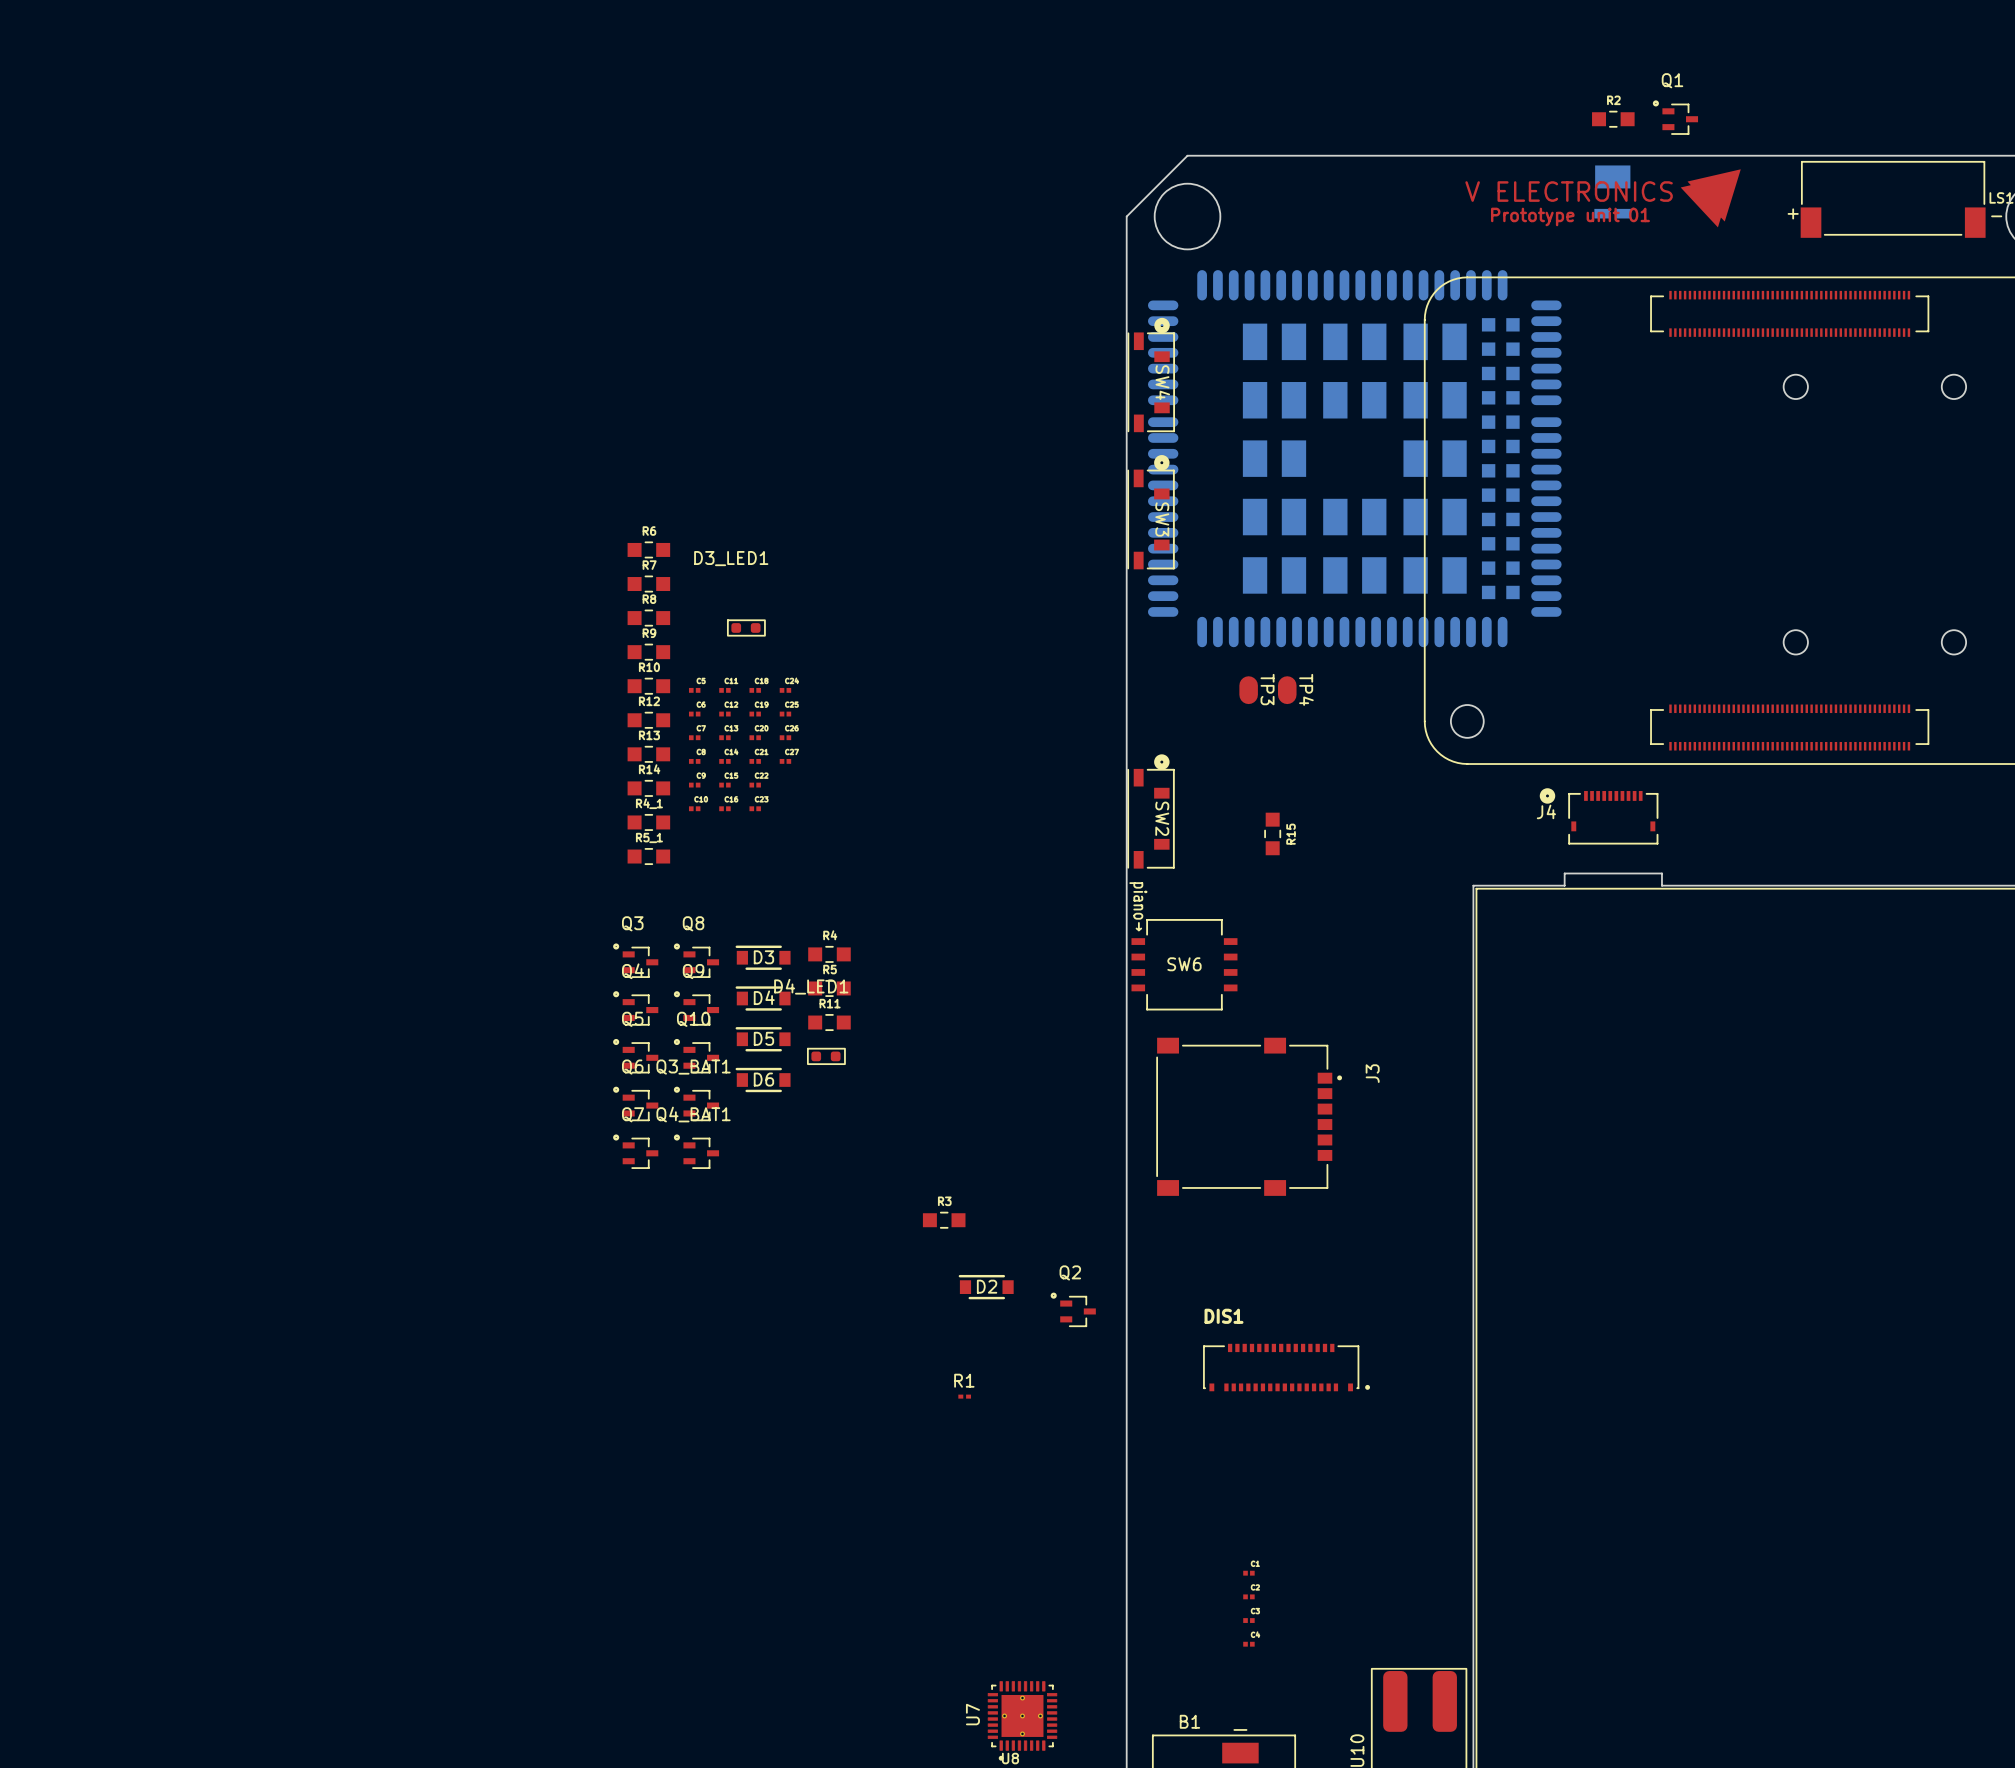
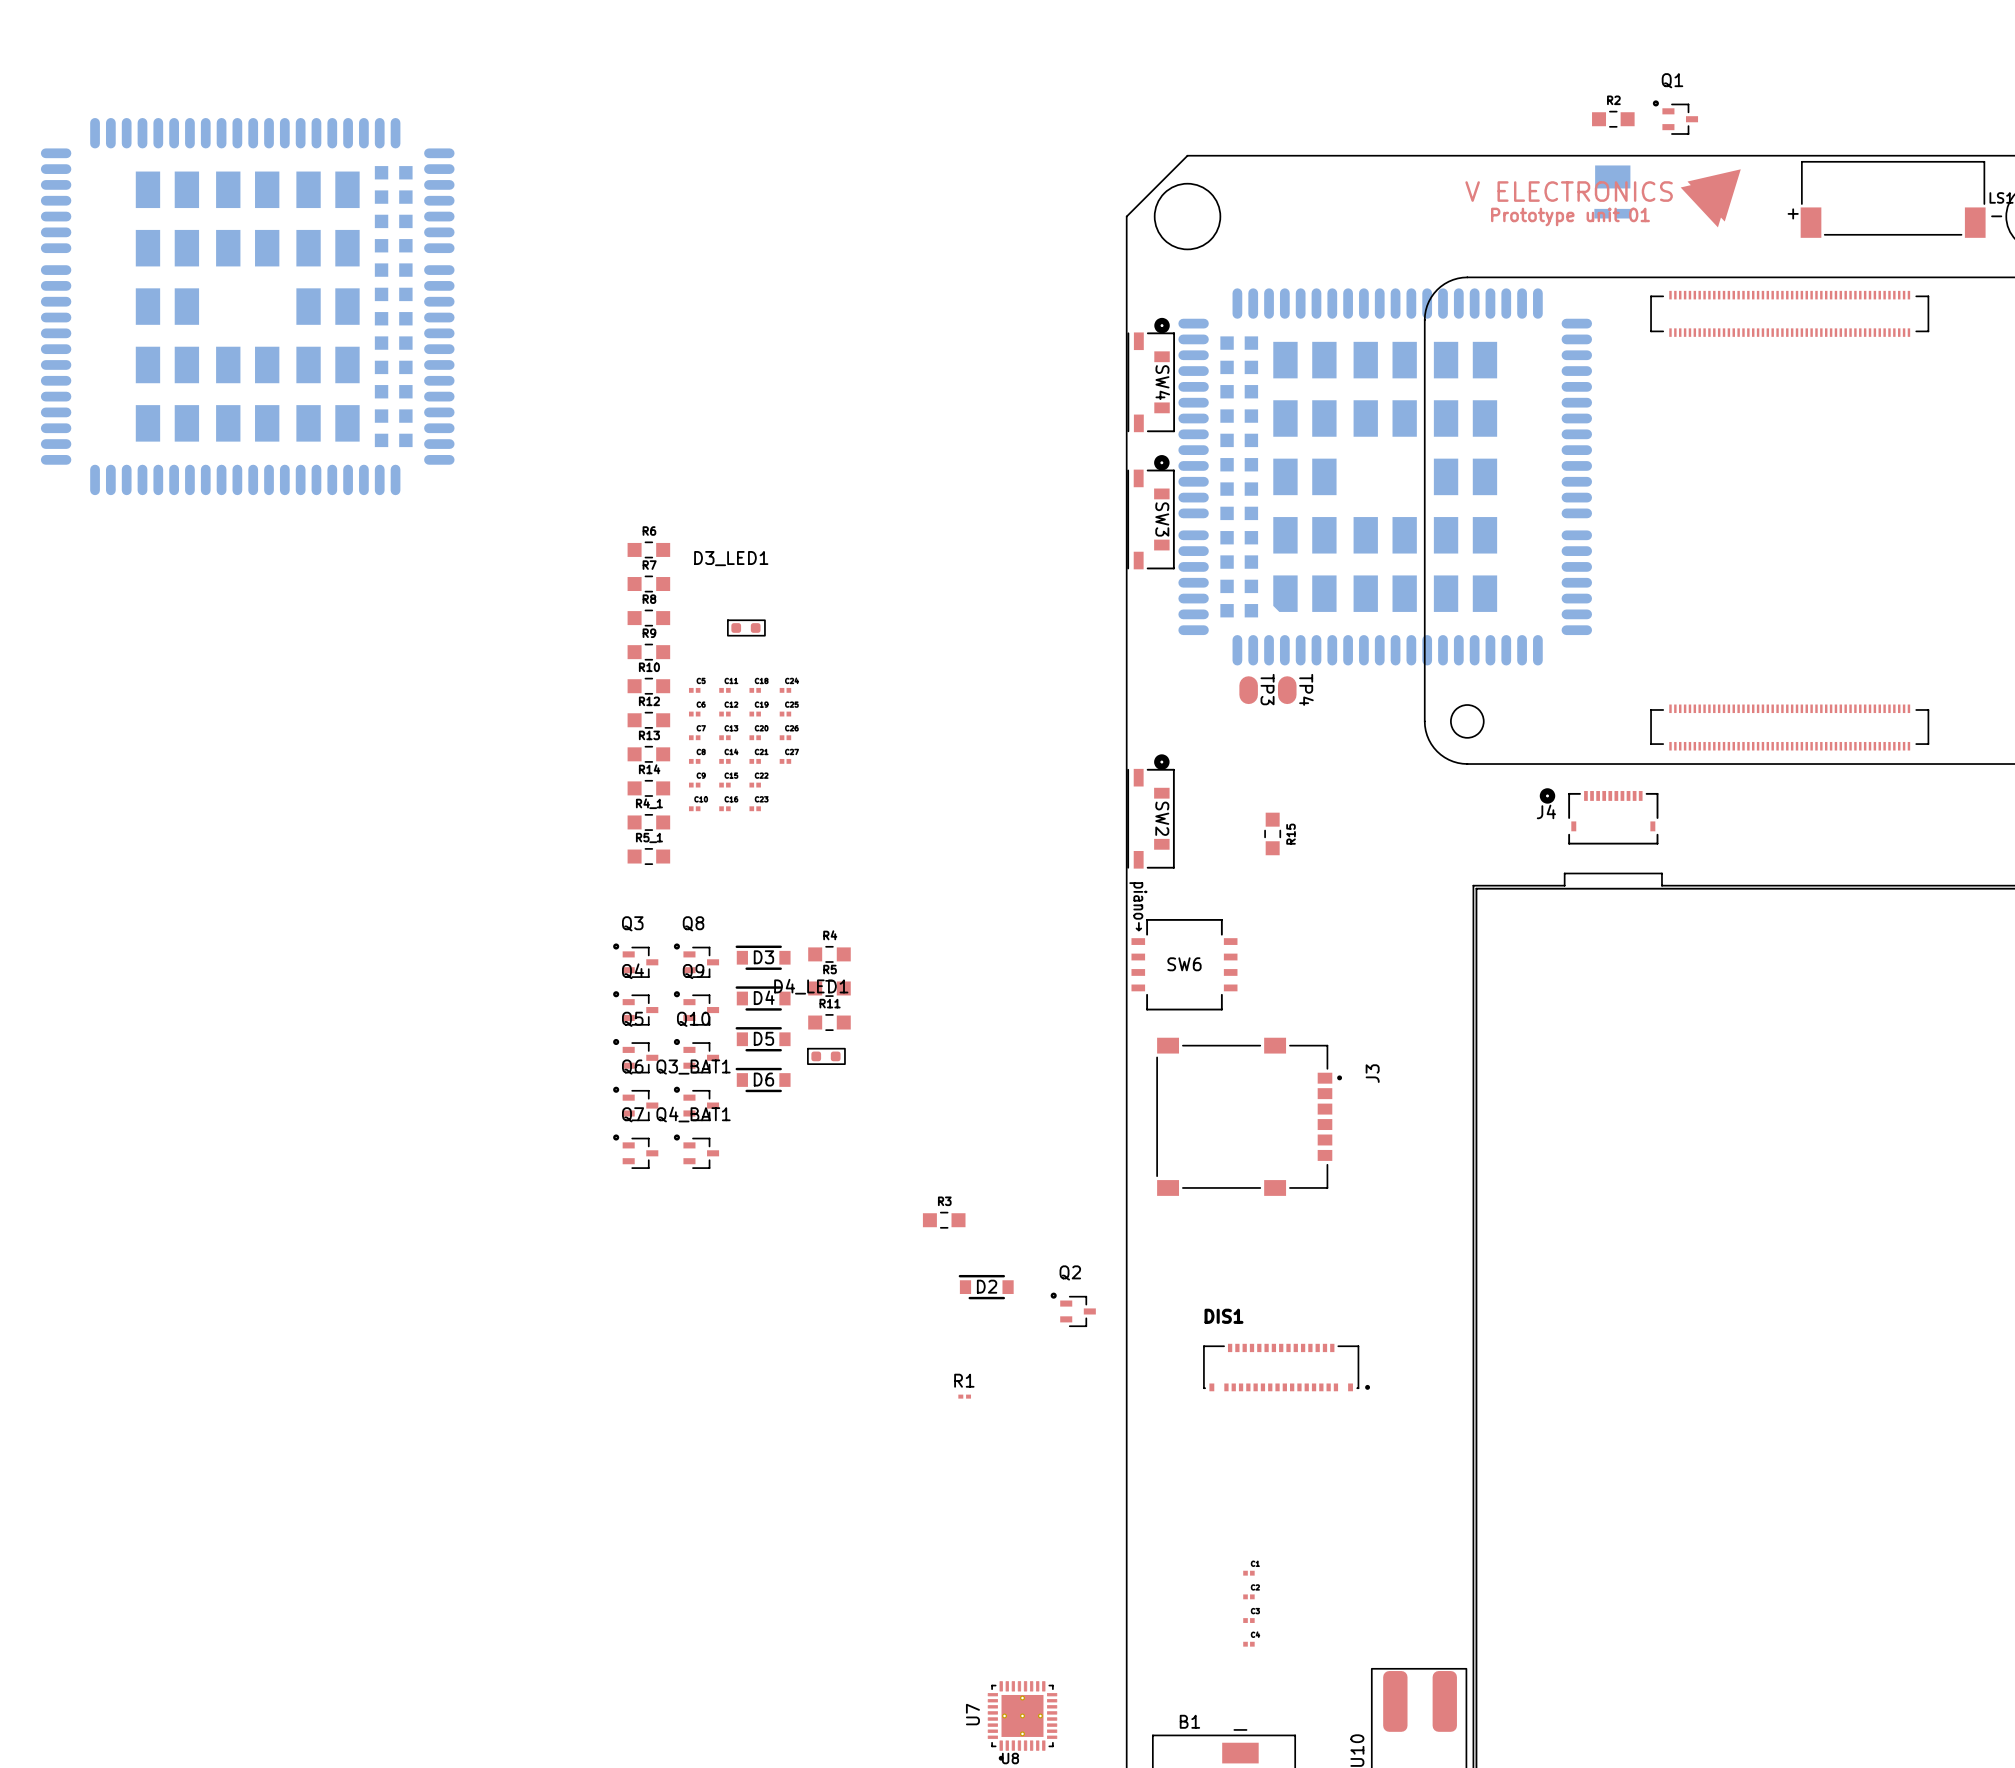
part: none -> (247, 306)
drawing: [1782, 373, 1967, 656] -> none
part: (1354, 458) -> none
part: none -> (1385, 476)

